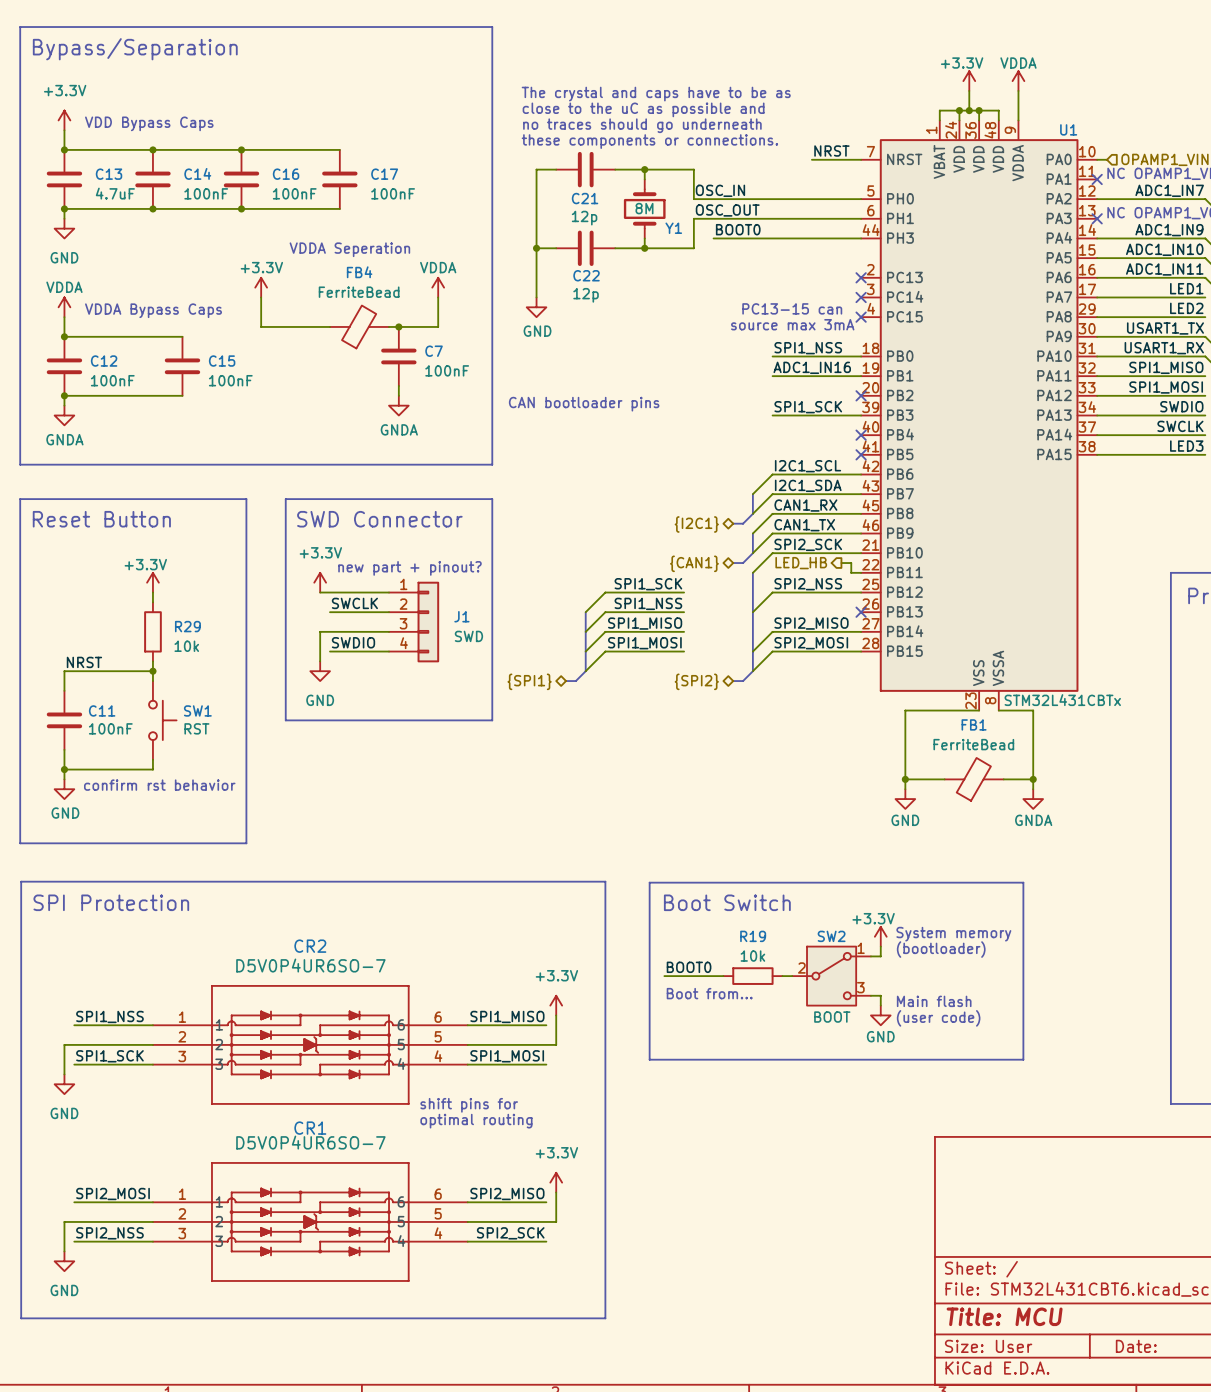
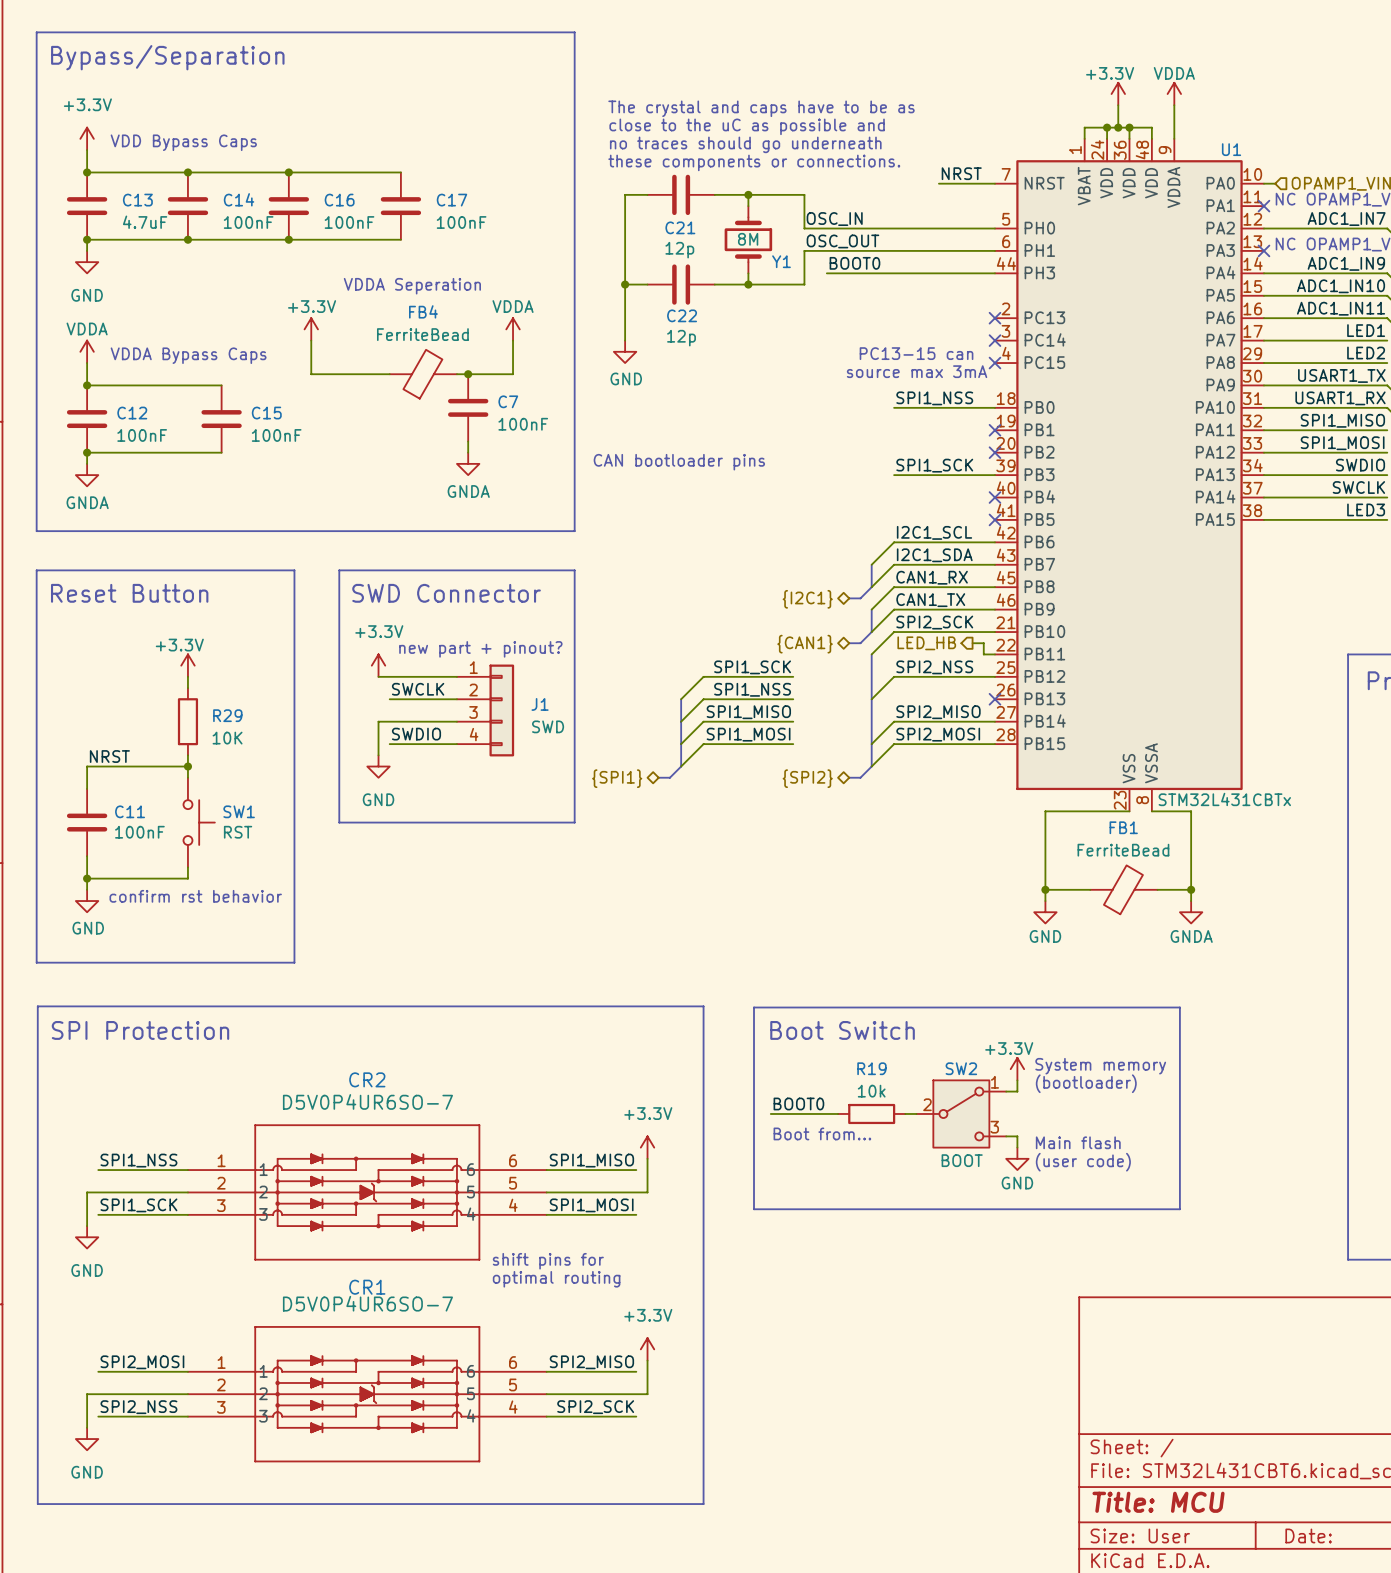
label: ADC1_IN16 (812, 367) -> none
wire: (772, 376) (861, 376) -> none
no-connect mark: none -> (994, 430)
R29 value: 10k (186, 646) -> 10K (227, 738)

